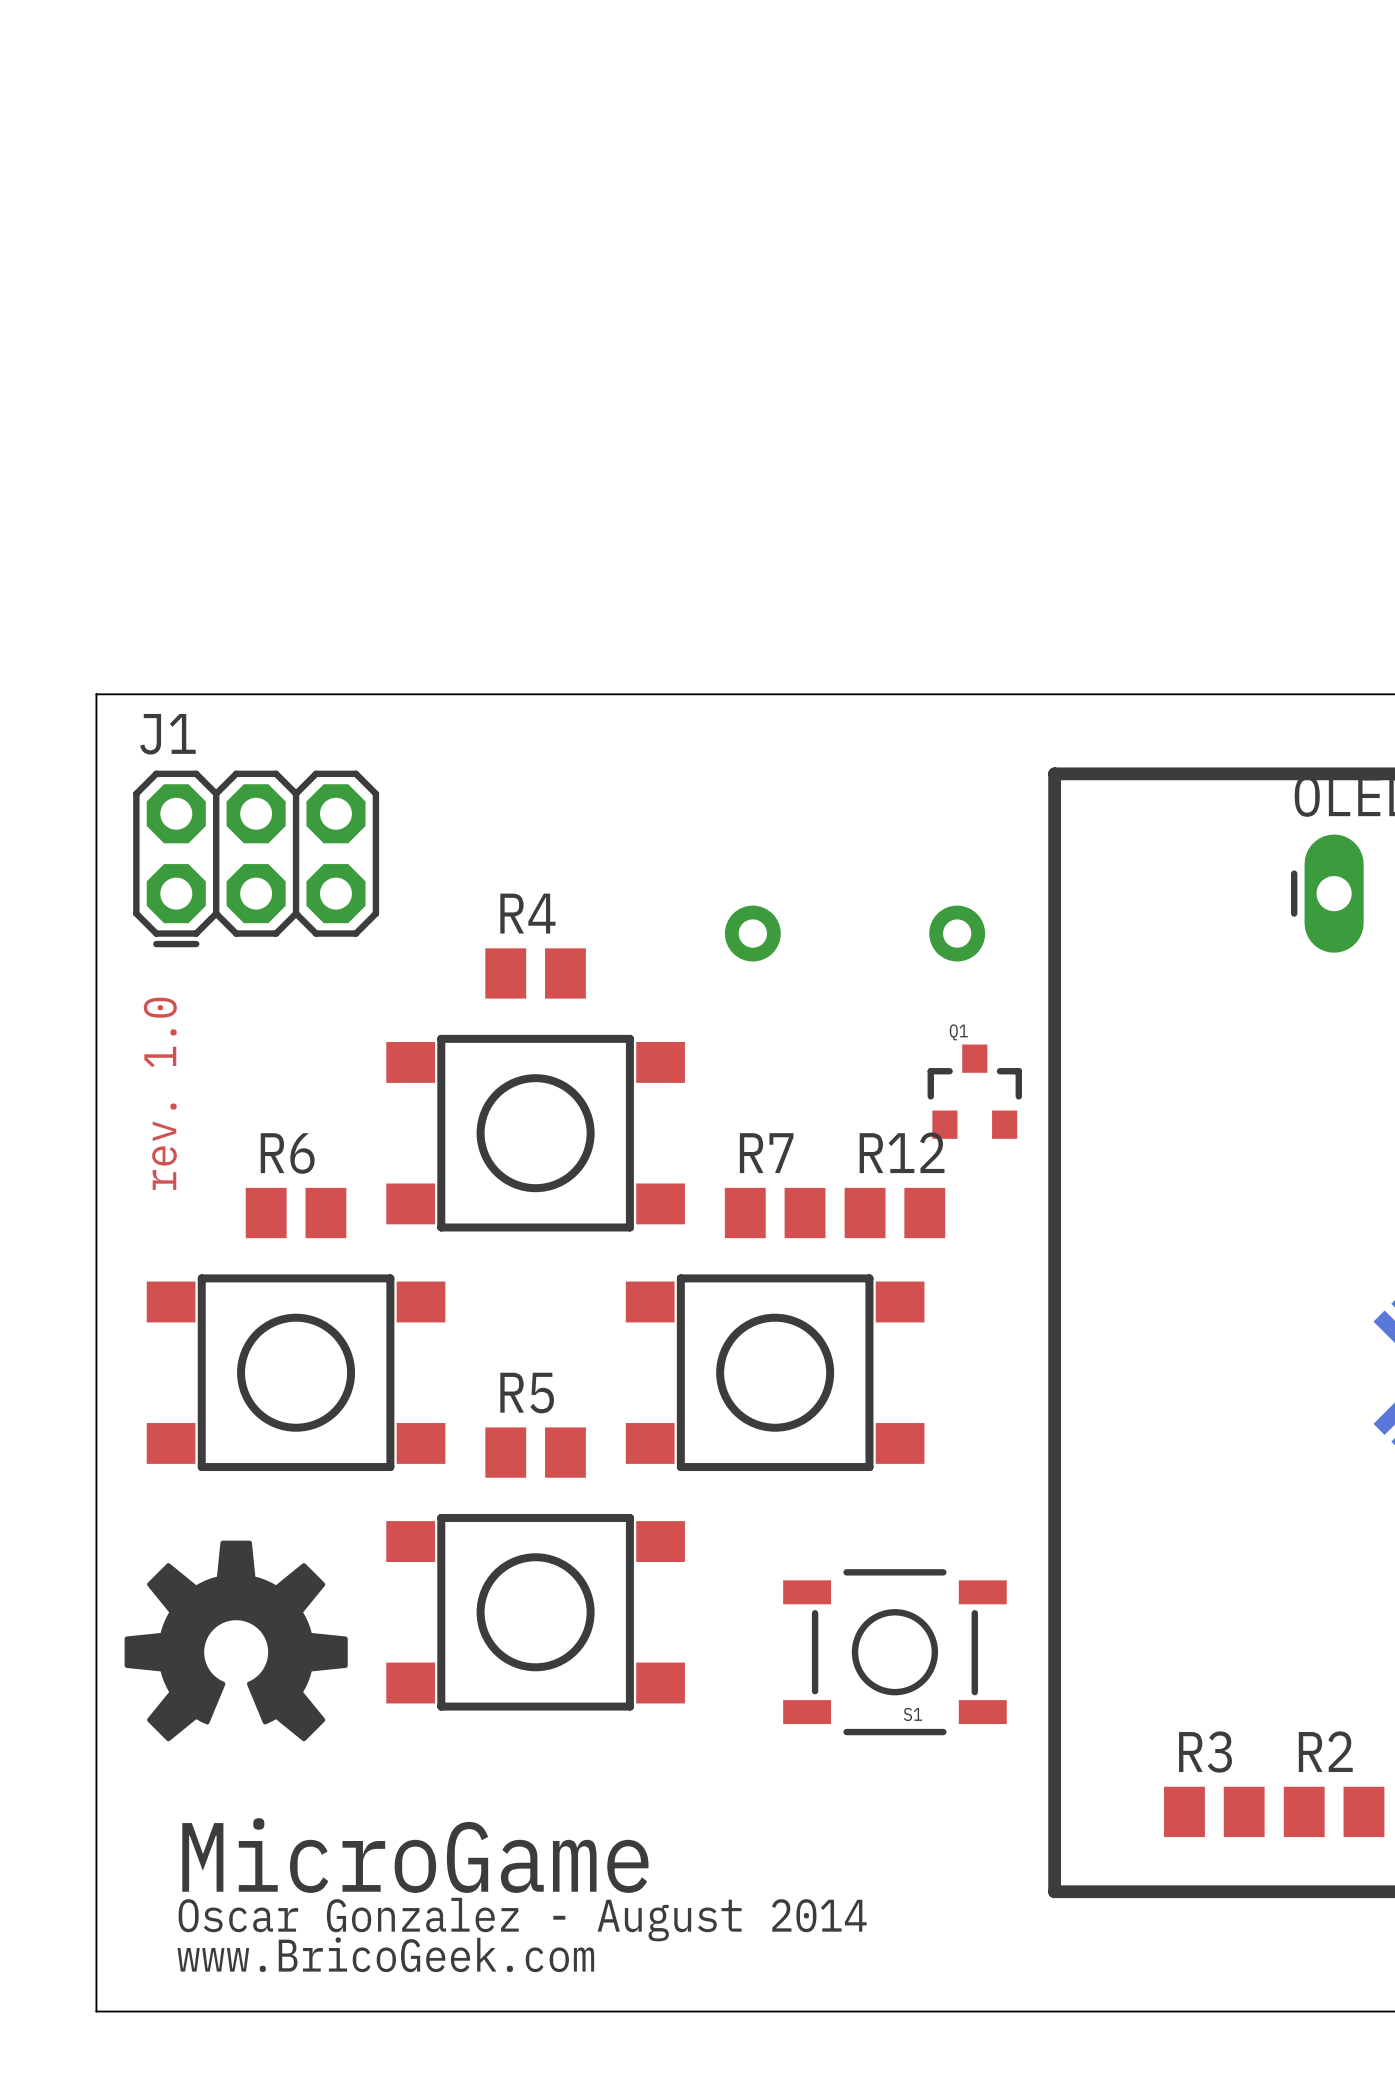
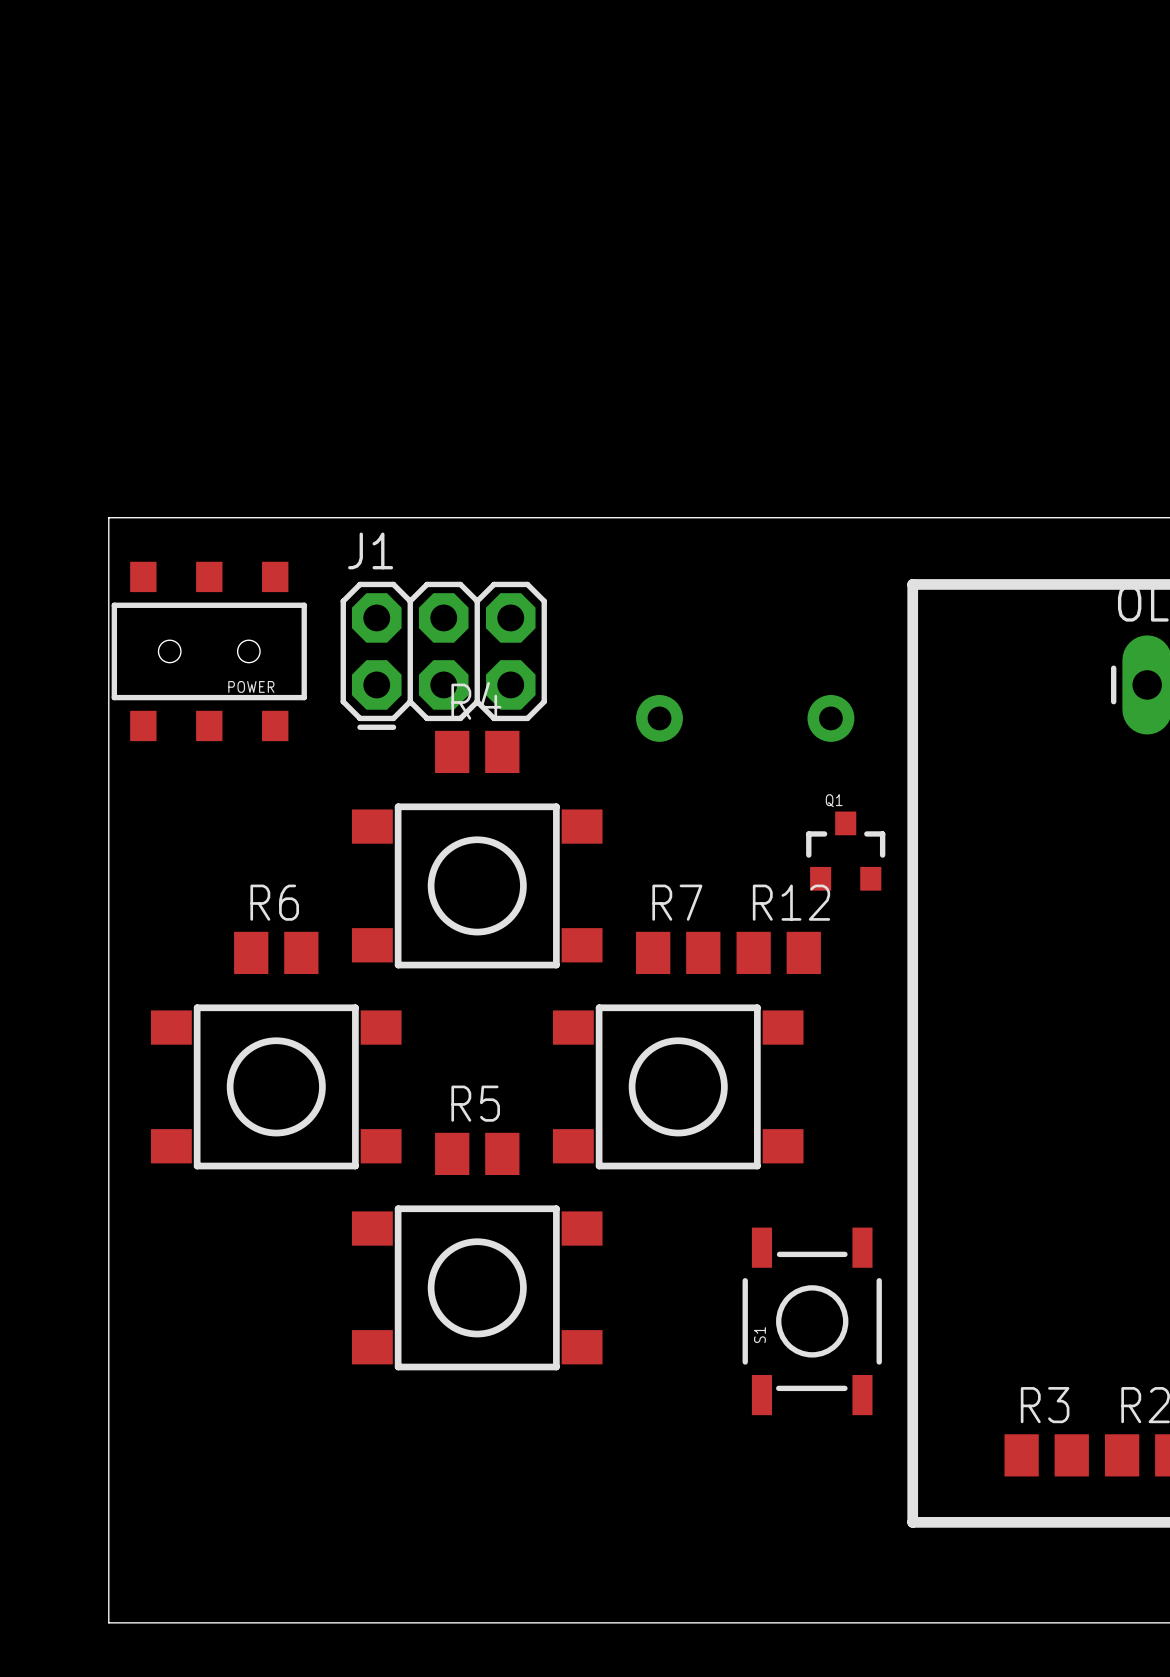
POWER: none -> (209, 651)
J1 position: (256, 858) -> (443, 655)
text: rev. 1.0 (160, 1093) -> none
drawing: [124, 1540, 348, 1742] -> none
S1 rotation: 0° (894, 1652) -> 90° clockwise (812, 1321)
text: MicroGame (415, 1855) -> none
text: Oscar Gonzalez - August 2014 (522, 1919) -> none
text: www.BricoGeek.com (385, 1954) -> none

